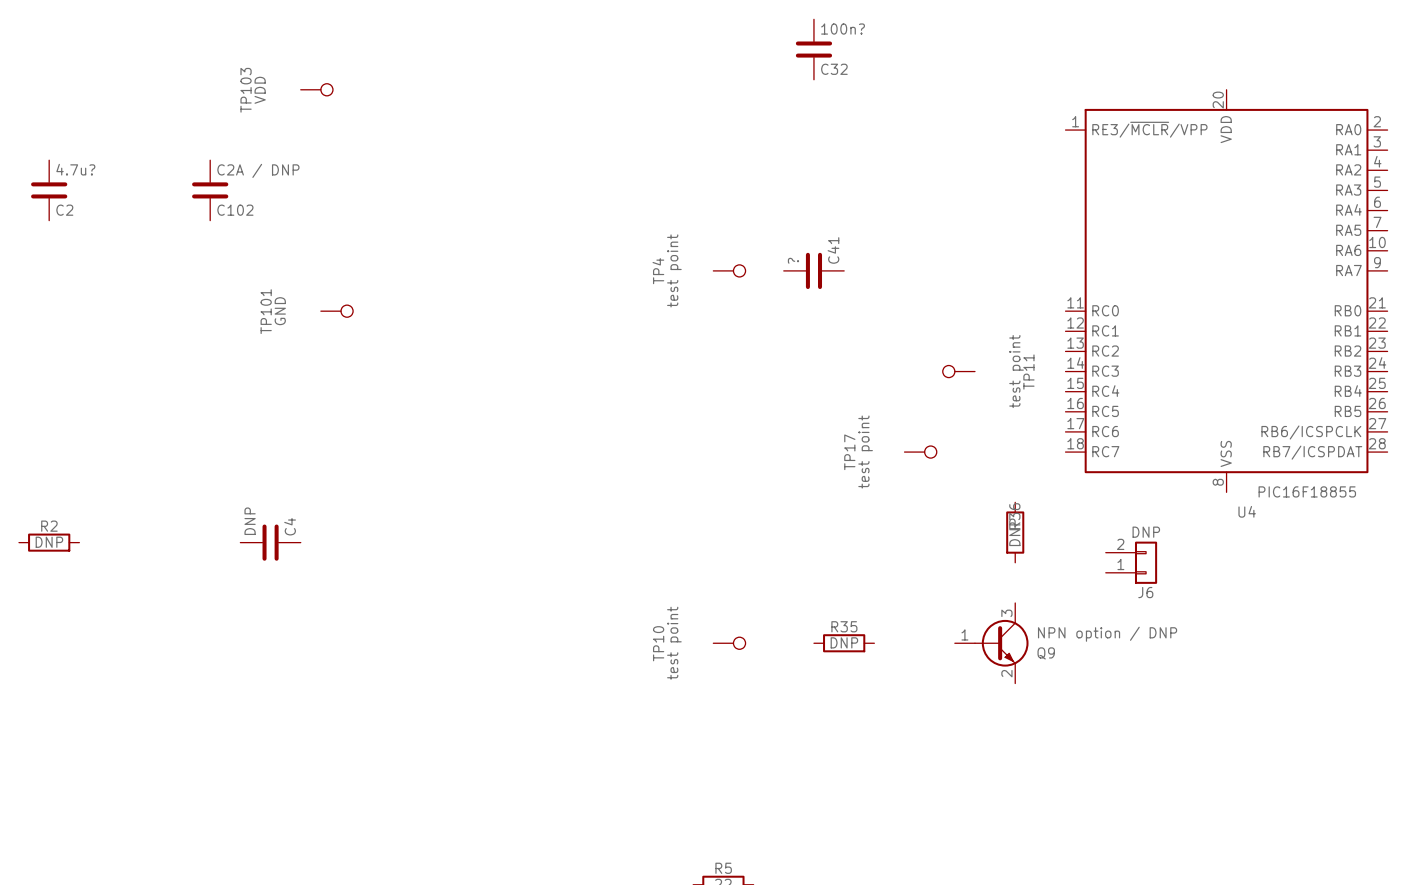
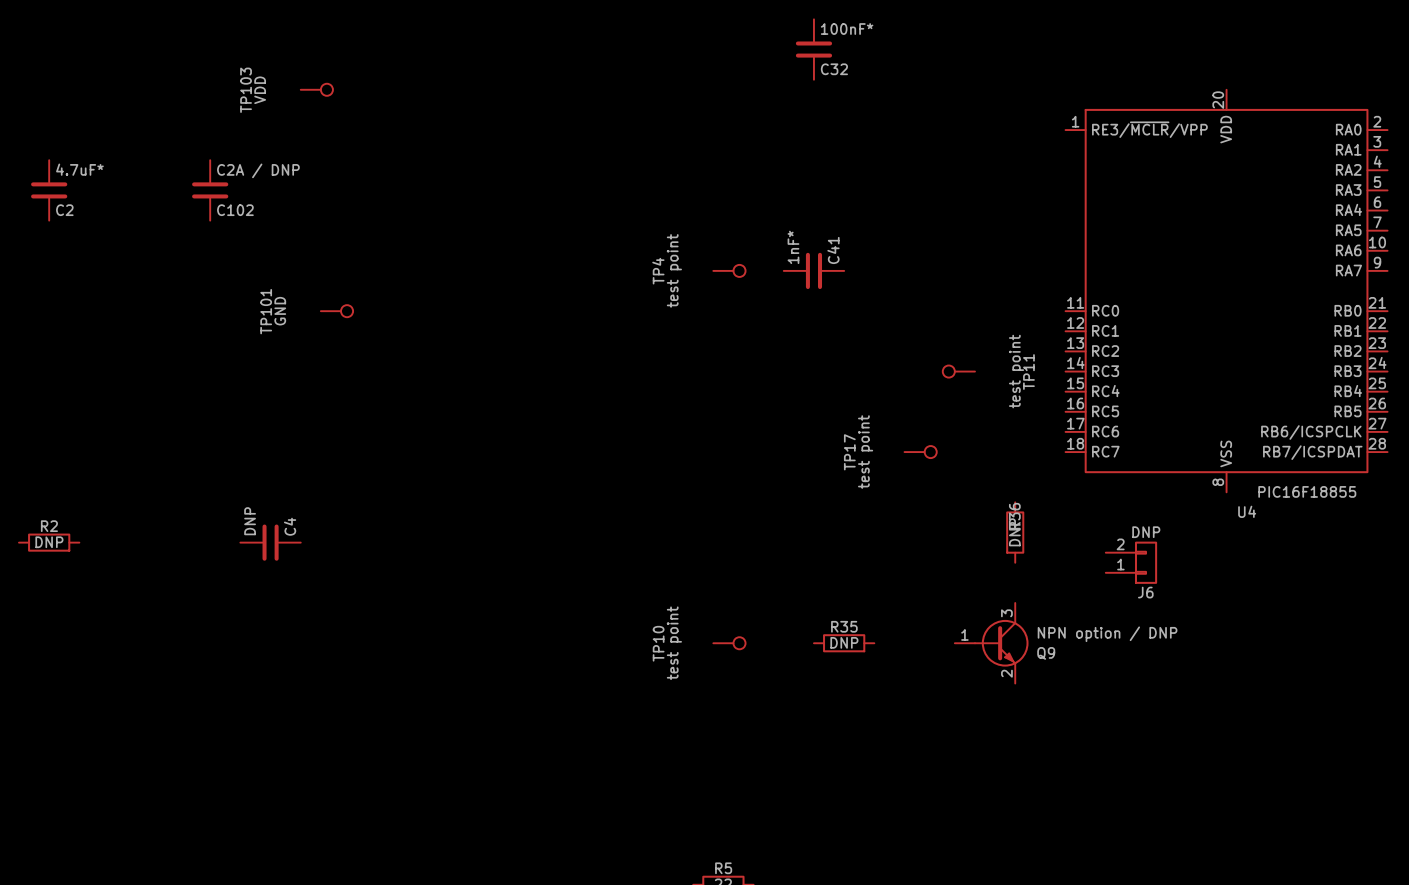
C32 value: 100n? (843, 29) -> 100nF* (847, 29)
C2 value: 4.7u? (75, 169) -> 4.7uF* (79, 169)
C41 value: ? (793, 260) -> 1nF* (793, 247)

